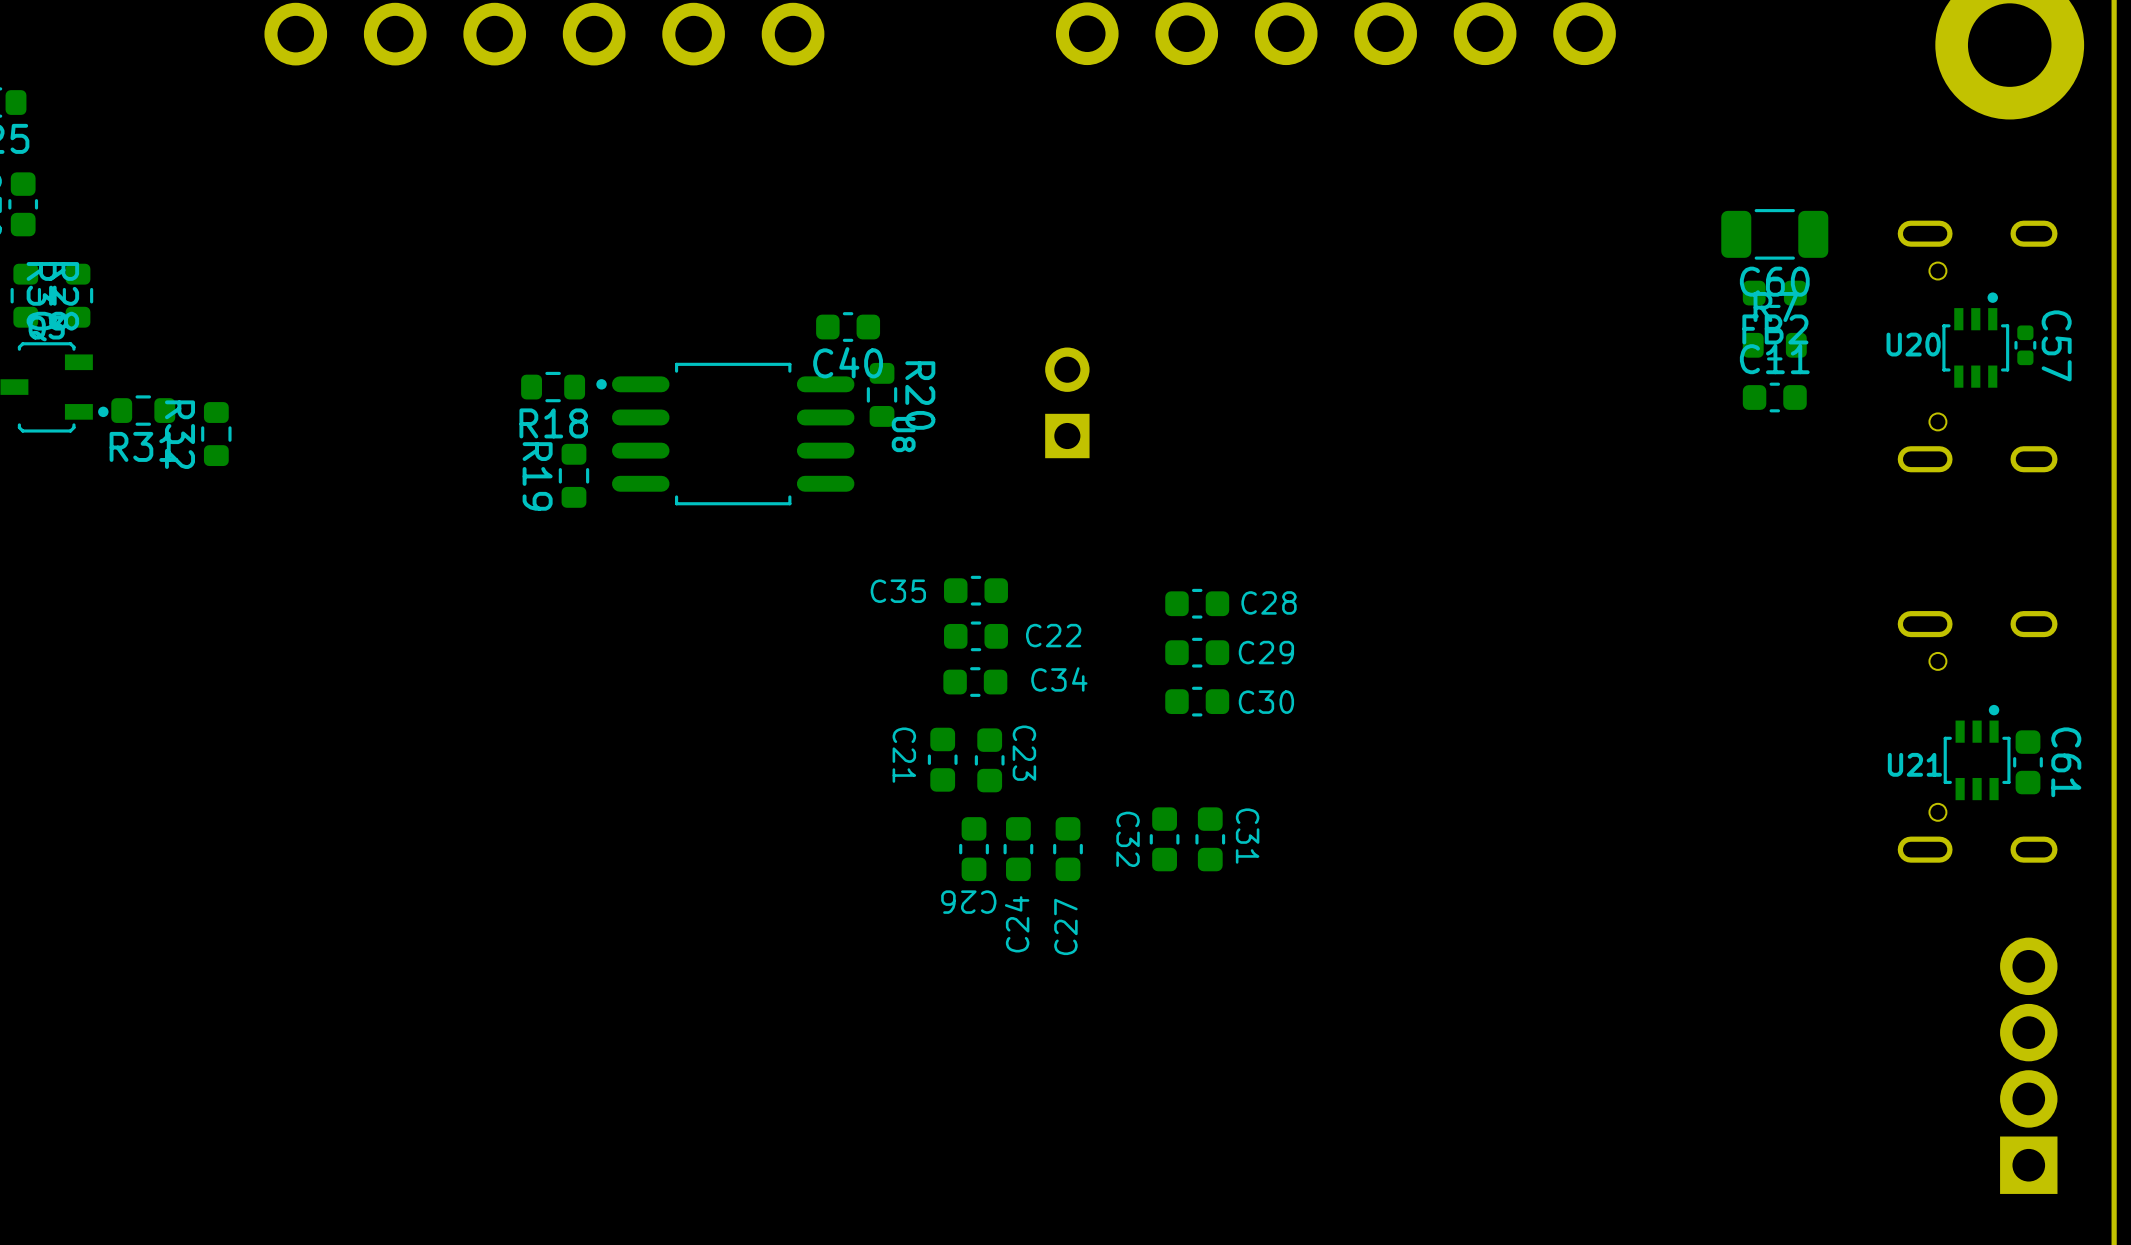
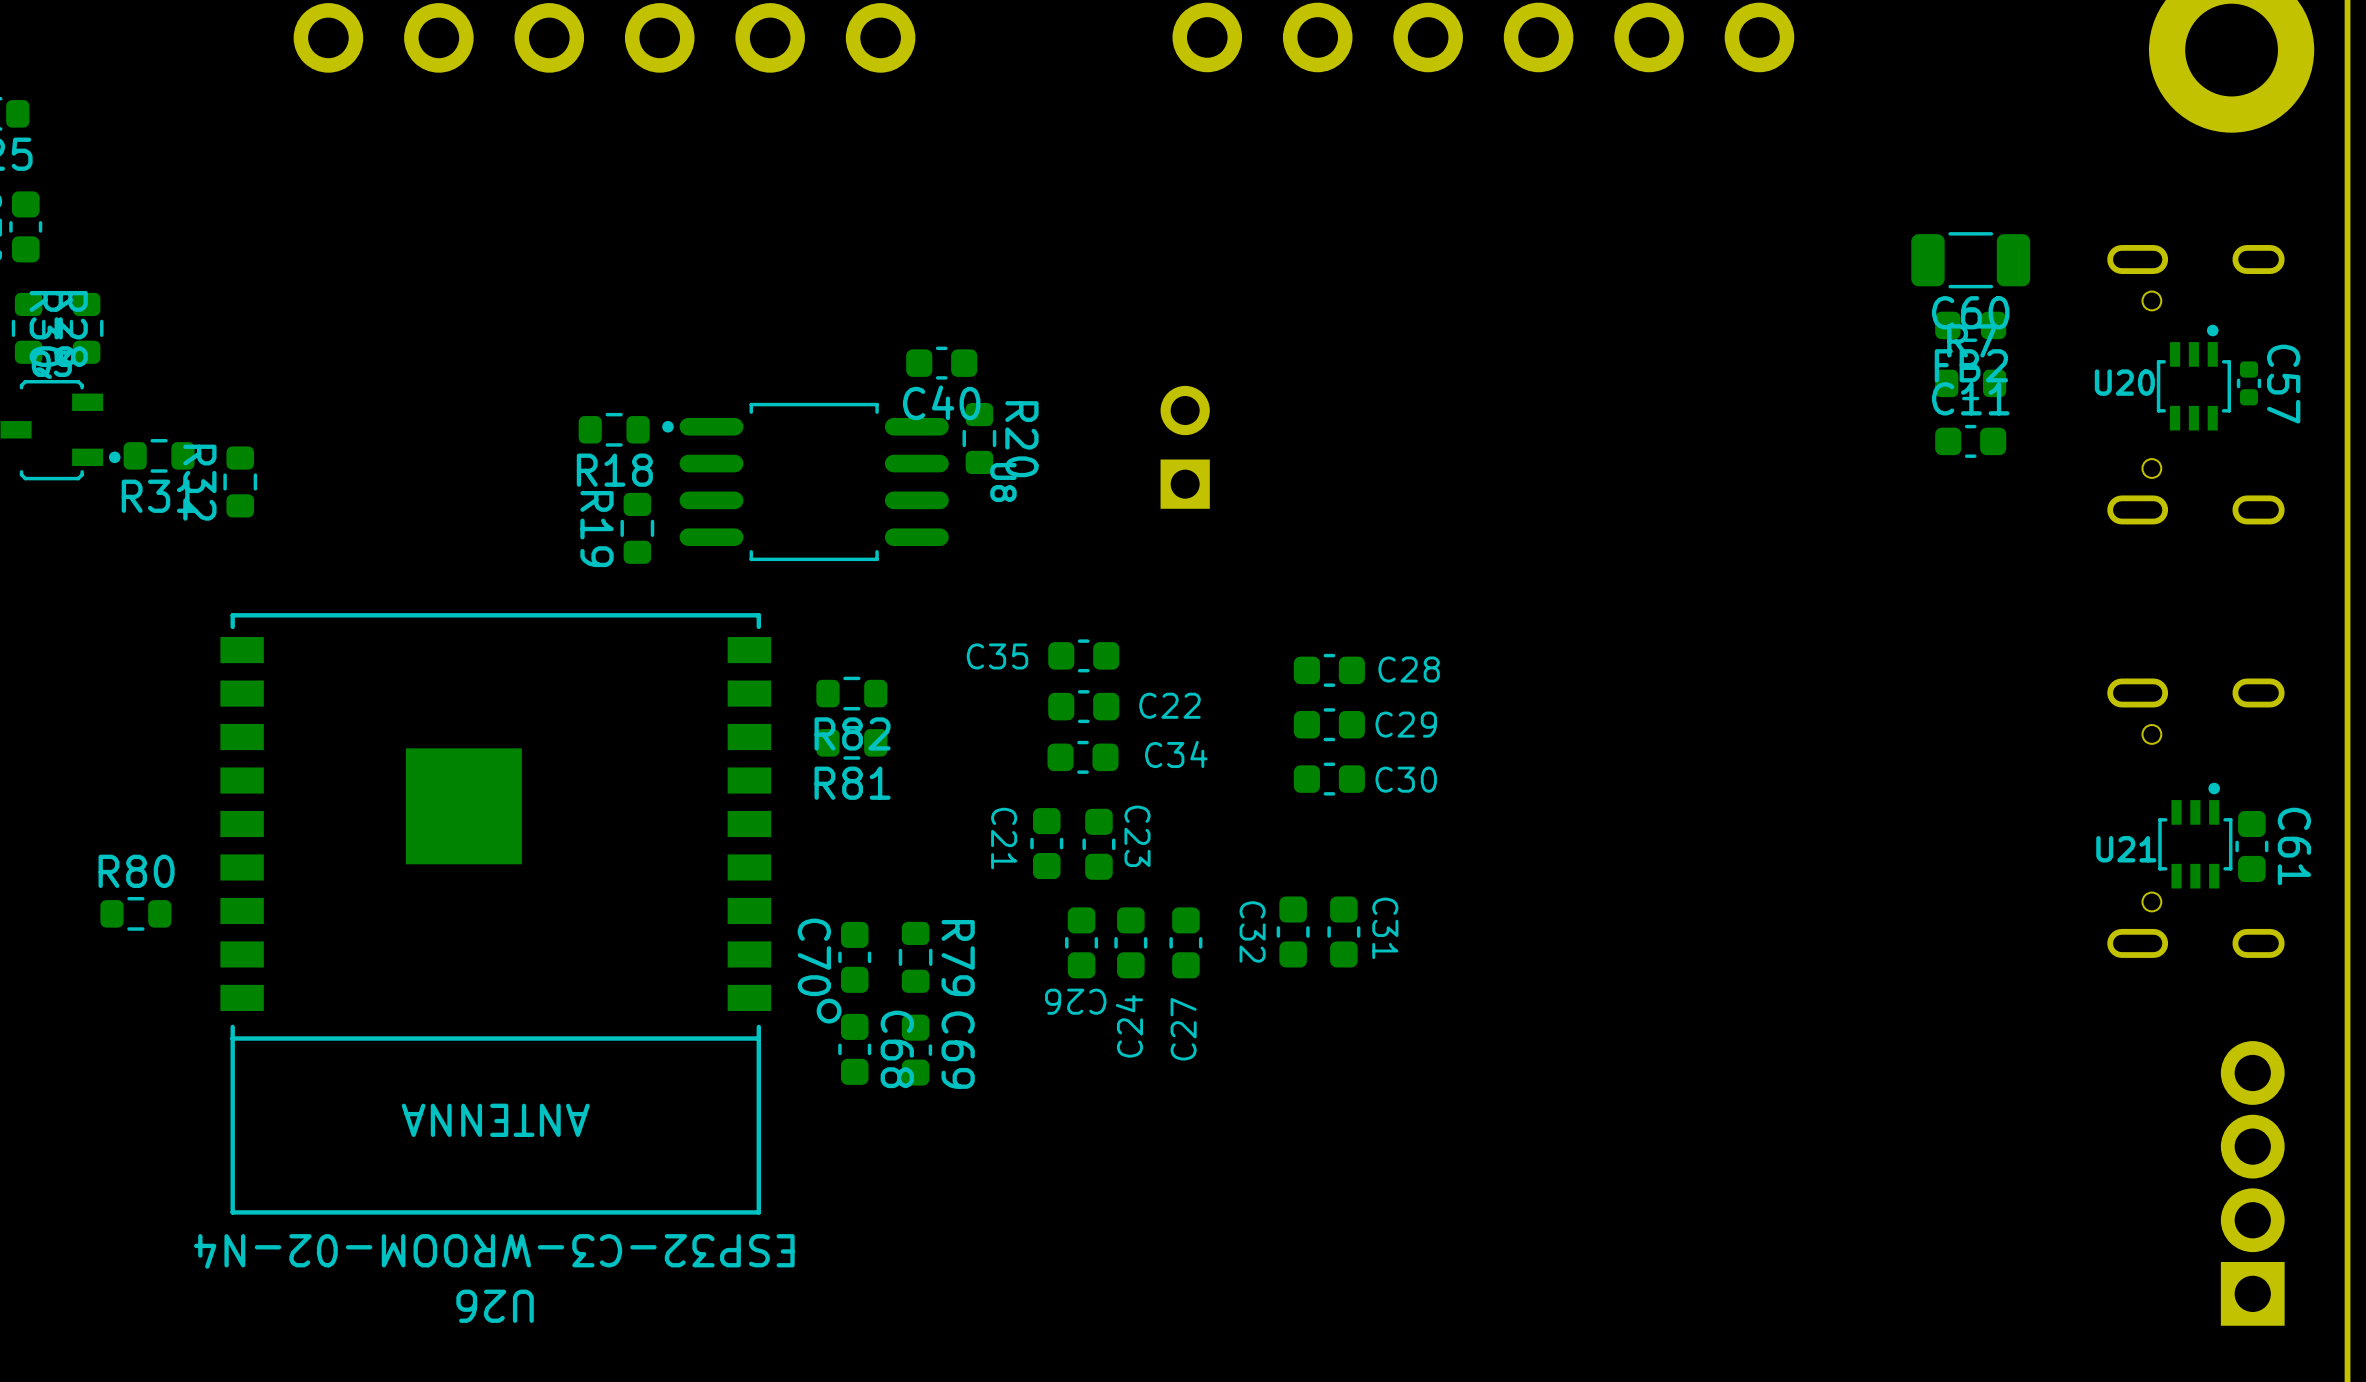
R82: none -> (851, 693)
R81: none -> (851, 742)
R80: none -> (135, 913)
U26: none -> ESP32-C3-WROOM-02-N4 (530, 913)
C70: none -> (854, 957)
R79: none -> (915, 957)
C68: none -> (854, 1049)
C69: none -> (915, 1050)

